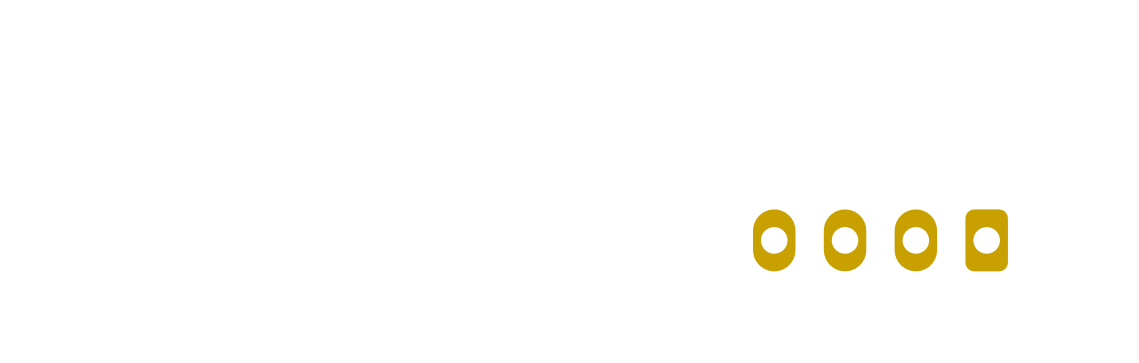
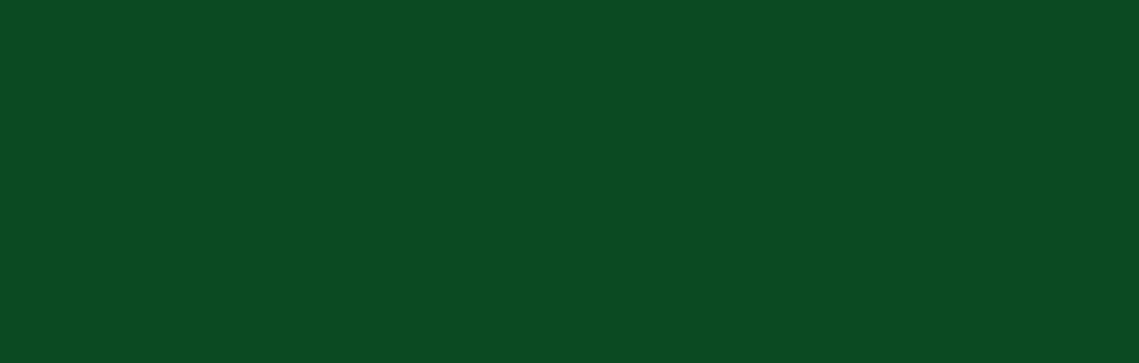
part: (880, 240) -> none

